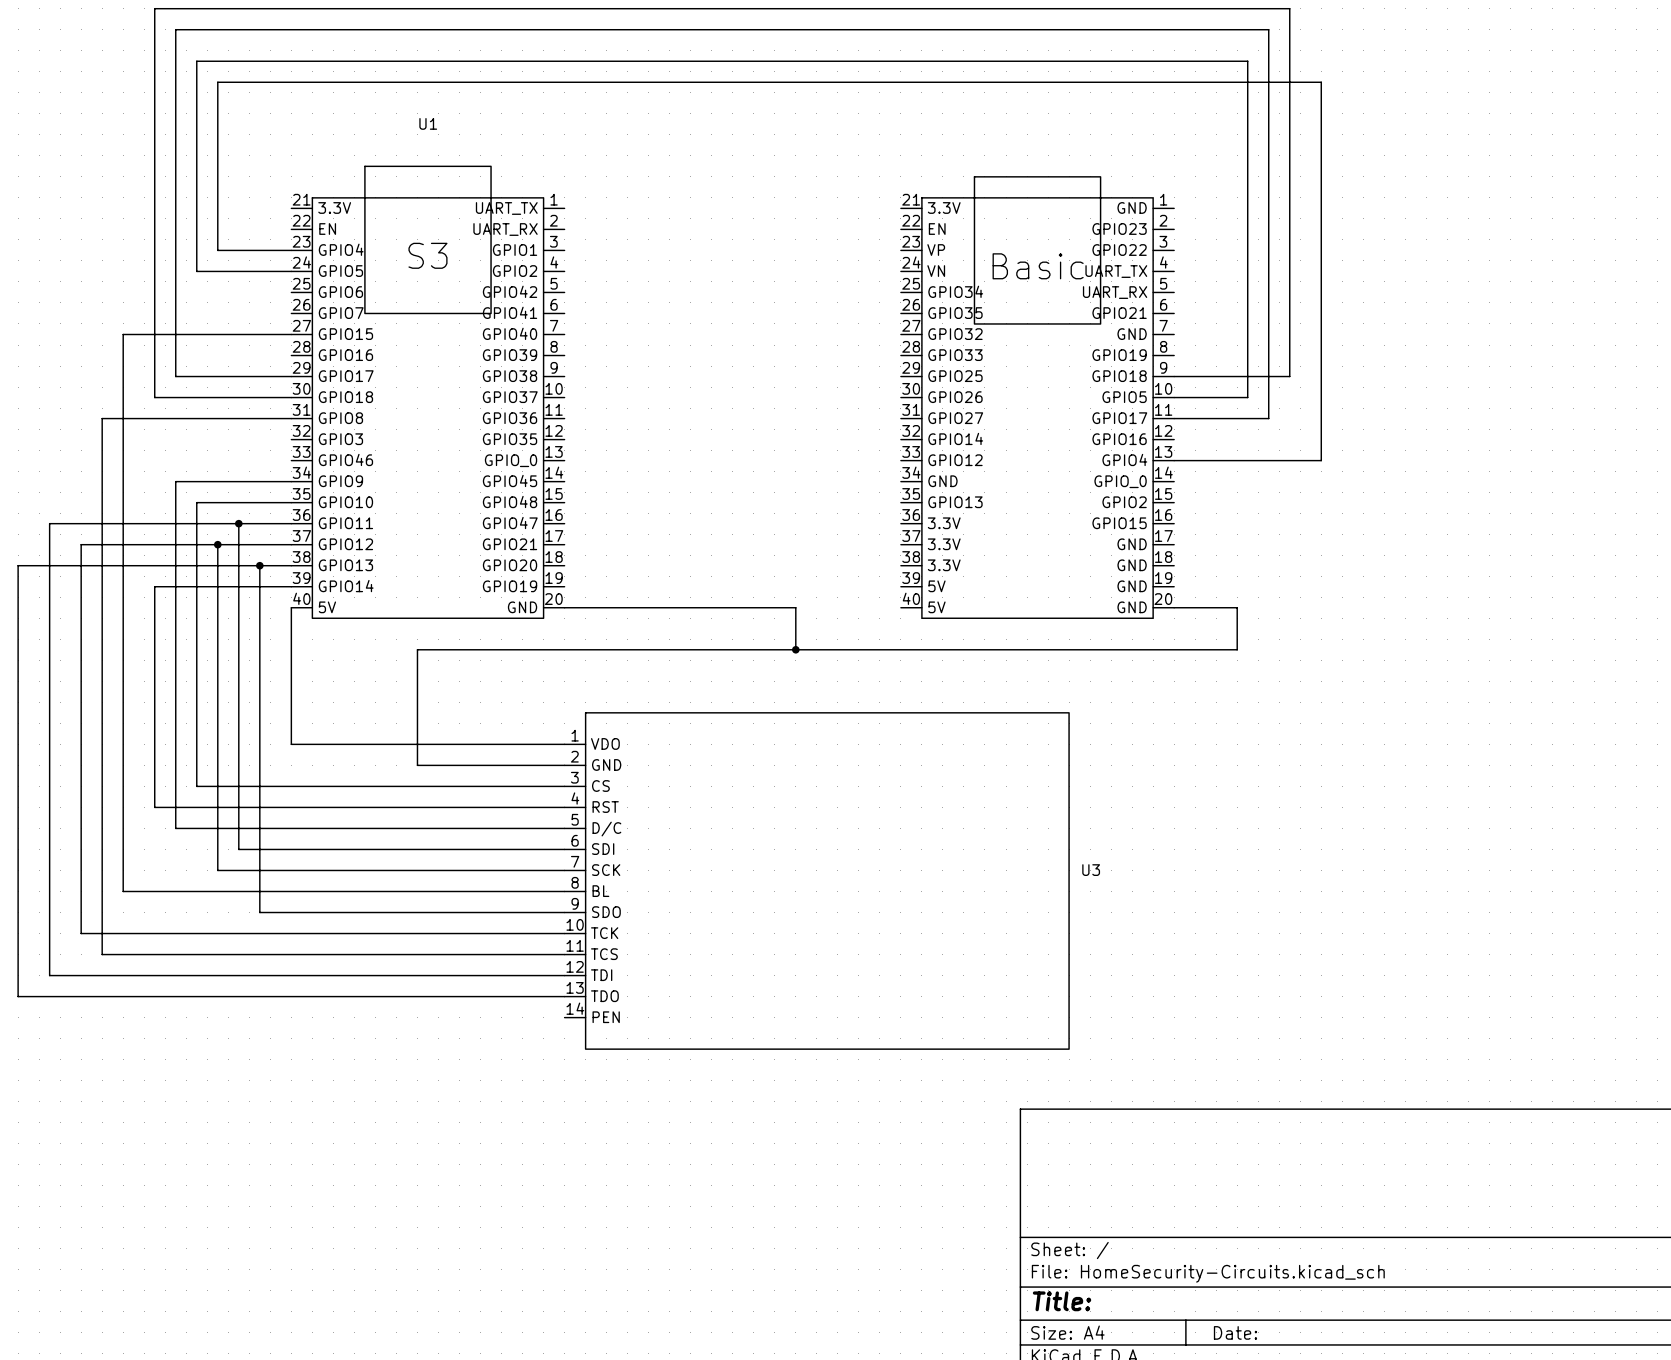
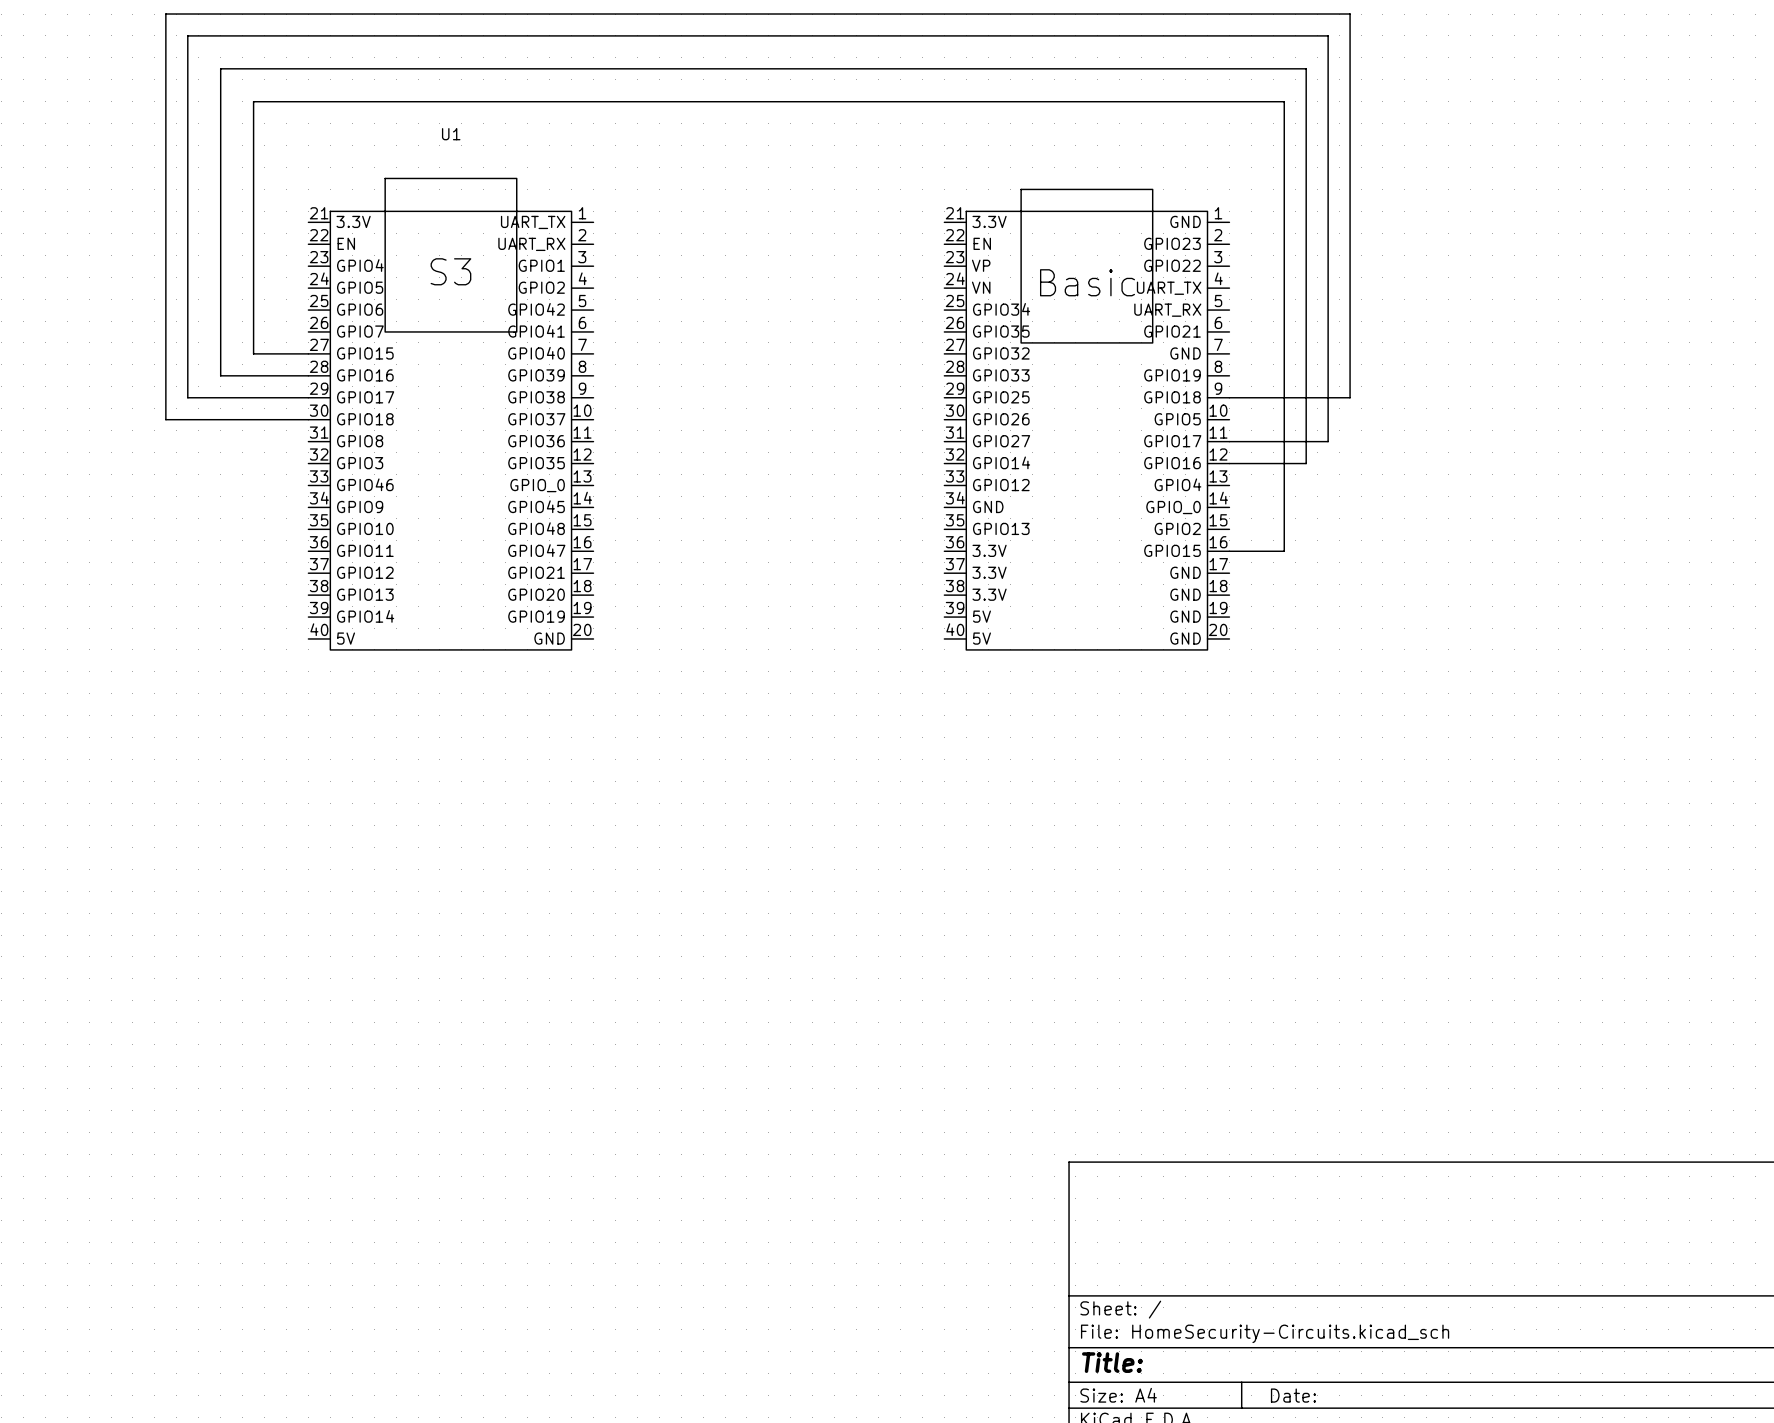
wire: (207, 61) (196, 61) (196, 271) (291, 271) -> (220, 68) (220, 375) (308, 375)
wire: (291, 250) (217, 250) (217, 82) (1321, 82) (1321, 460) (1174, 460) -> none
wire: (238, 334) (123, 334) (123, 891) (564, 891) -> (253, 353) (253, 101) (1284, 101) (1284, 551) (1229, 551)
wire: (1174, 397) (1247, 397) -> (1229, 463) (1306, 463) (1306, 419)
wire: (291, 418) (102, 418) (102, 954) (564, 954) -> none
wire: (291, 481) (175, 481) (175, 828) (564, 828) -> none
wire: (291, 502) (196, 502) (196, 786) (564, 786) -> none
wire: (238, 523) (238, 849) (564, 849) -> none
junction: (238, 523) -> none
wire: (291, 523) (49, 523) (49, 975) (564, 975) -> none
wire: (217, 544) (217, 870) (564, 870) -> none
junction: (217, 544) -> none
wire: (291, 544) (81, 544) (81, 933) (564, 933) -> none
wire: (259, 565) (259, 912) (564, 912) -> none
junction: (259, 565) -> none
wire: (291, 565) (18, 565) (18, 996) (564, 996) -> none
wire: (291, 586) (154, 586) (154, 807) (564, 807) -> none
wire: (291, 607) (291, 744) (564, 744) -> none
wire: (564, 607) (795, 607) (795, 649) -> none
wire: (1174, 607) (1237, 607) (1237, 649) (417, 649) (417, 765) (564, 765) -> none
junction: (795, 649) -> none
U3: (816, 880) -> none

